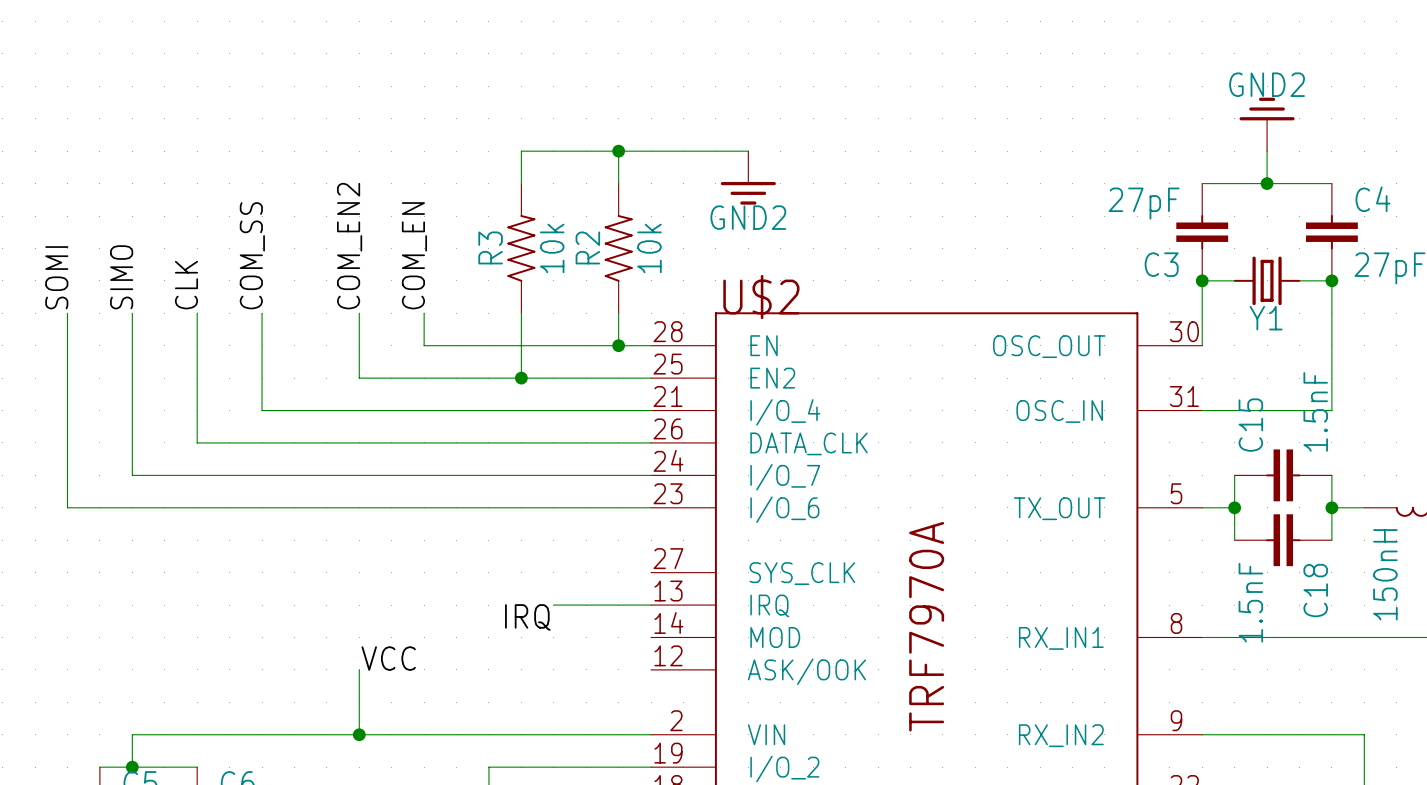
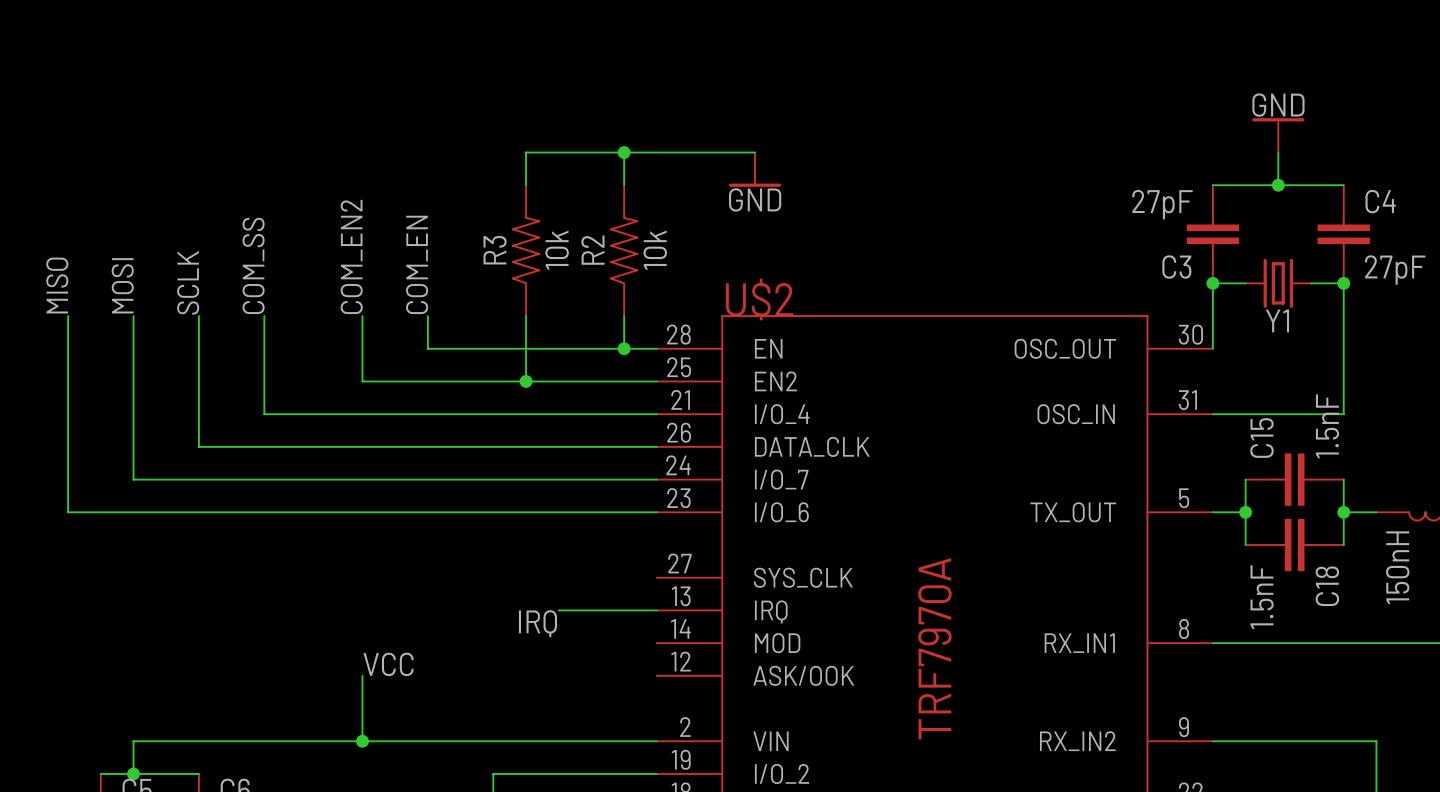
power symbol: GND2 (1267, 124) -> GND (1278, 135)
power symbol: GND2 (748, 177) -> GND (754, 169)
label: SOMI (56, 277) -> MISO (57, 285)
label: SIMO (121, 277) -> MOSI (122, 285)
label: CLK (186, 285) -> SCLK (188, 282)

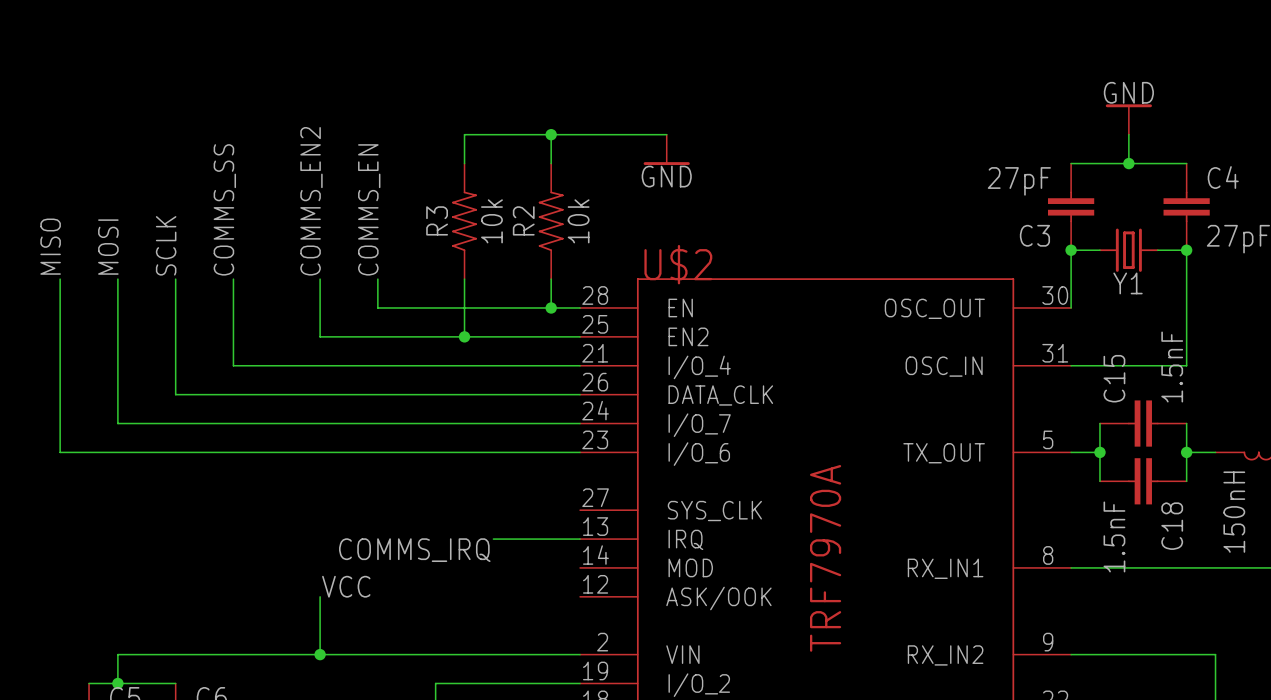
label: COM_EN2 (351, 256) -> COMMS_EN2 (311, 201)
label: COM_EN (417, 264) -> COMMS_EN (369, 209)
label: COM_SS (253, 265) -> COMMS_SS (224, 209)
label: IRQ (537, 623) -> COMMS_IRQ (414, 550)

